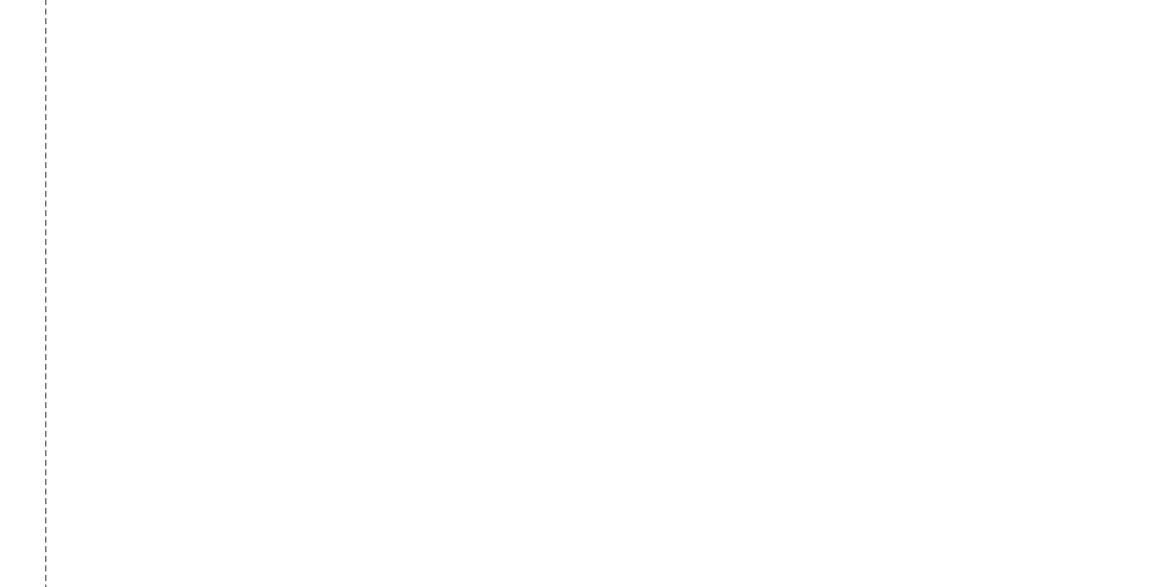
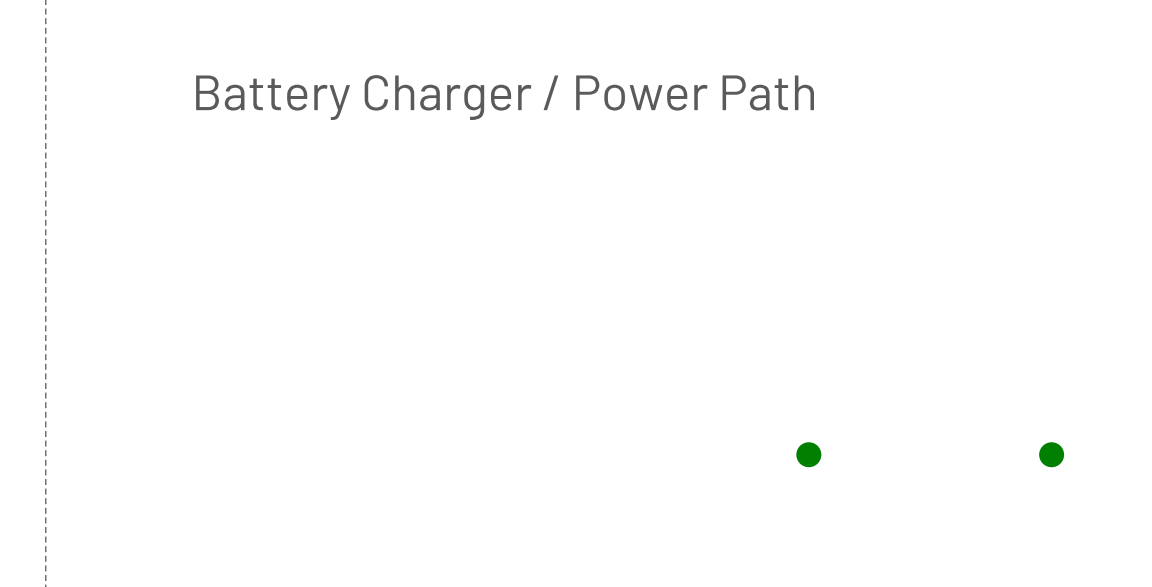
text: none -> Battery Charger / Power Path (505, 97)
junction: none -> (808, 454)
junction: none -> (1051, 454)

